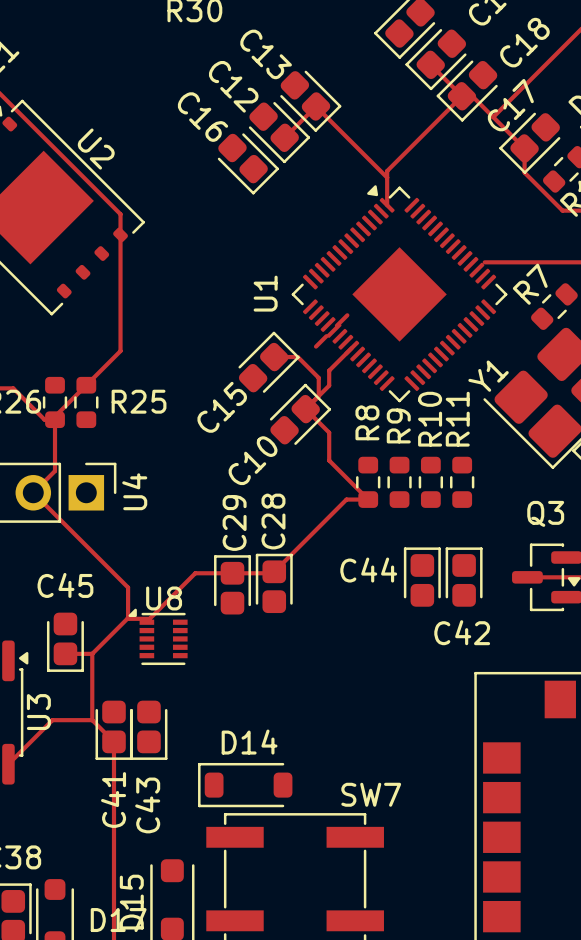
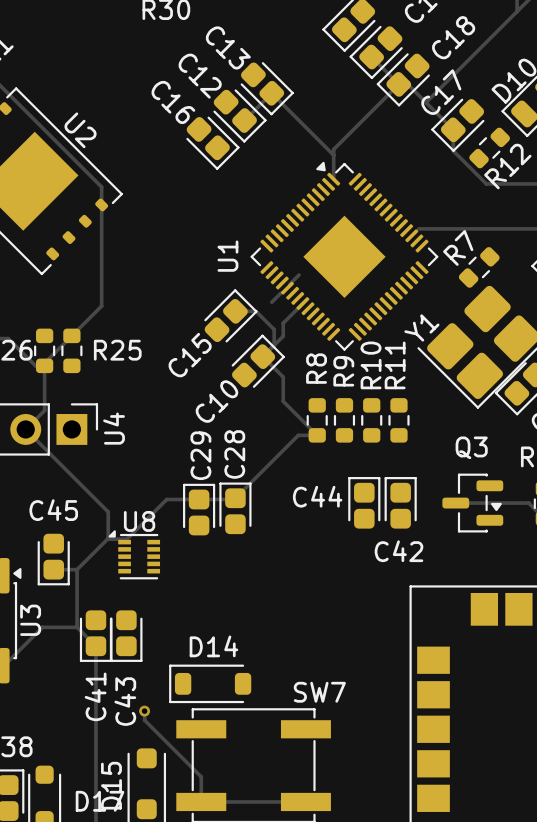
track: none -> (144, 711) (144, 720) (201, 776) (201, 801) (305, 801)
via: none -> (144, 711)

